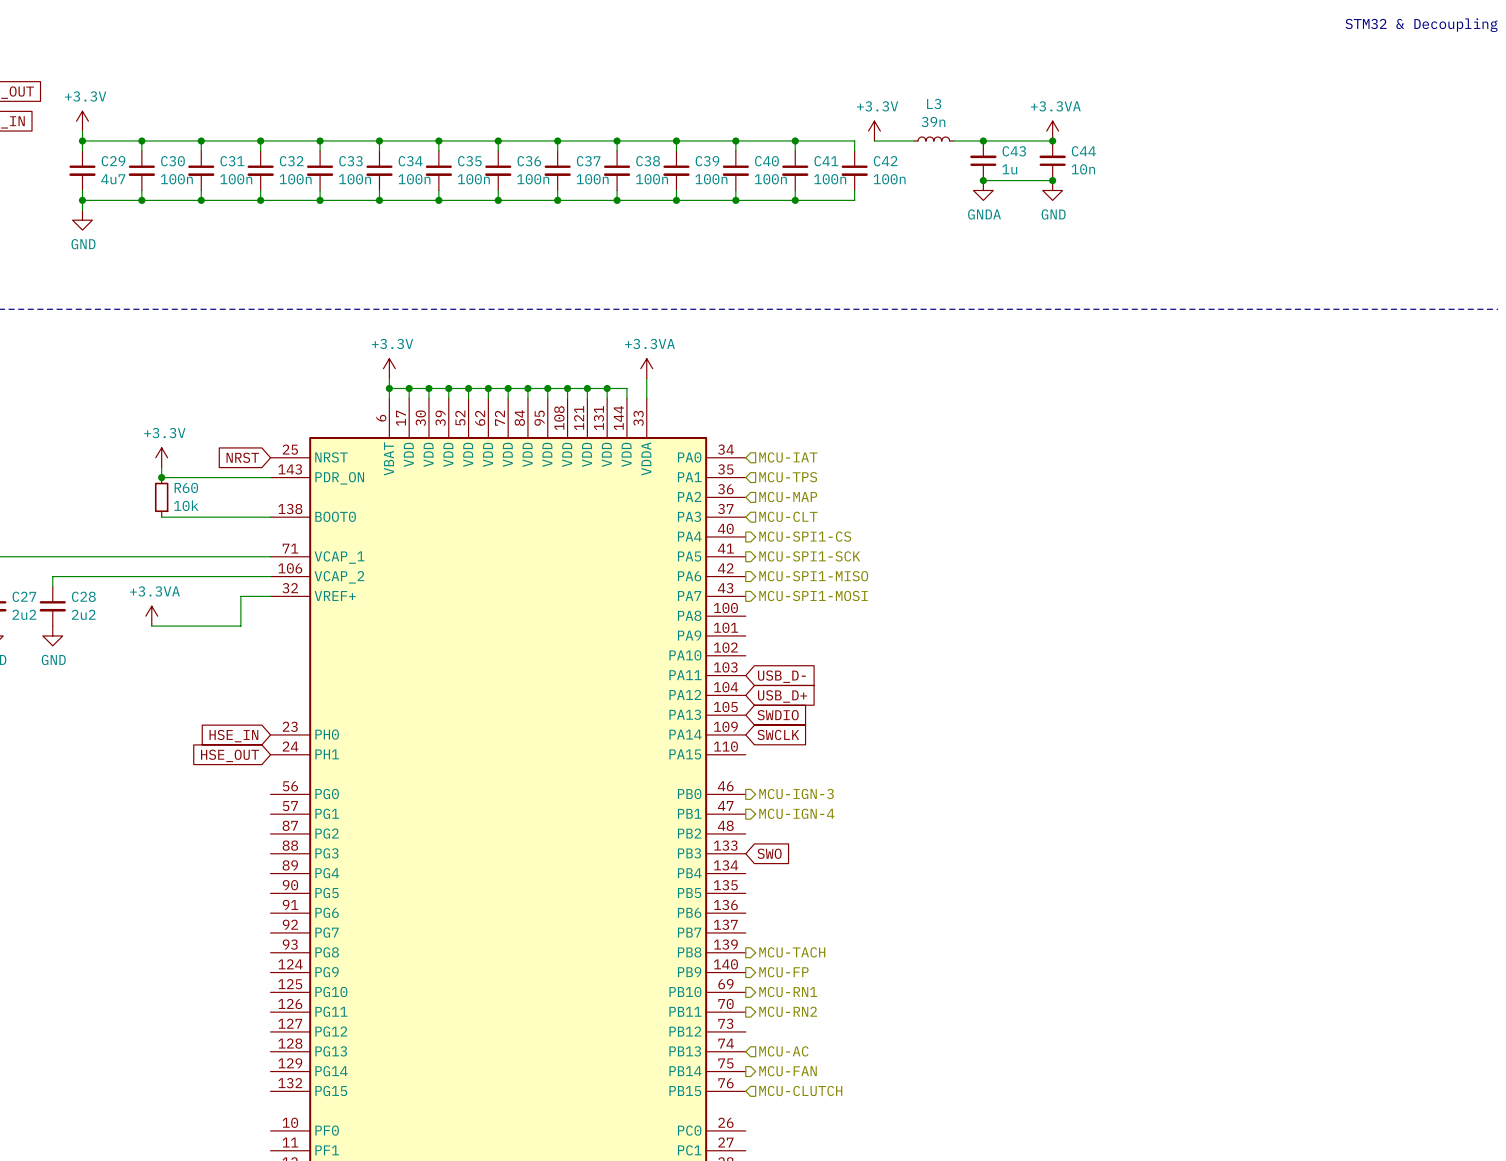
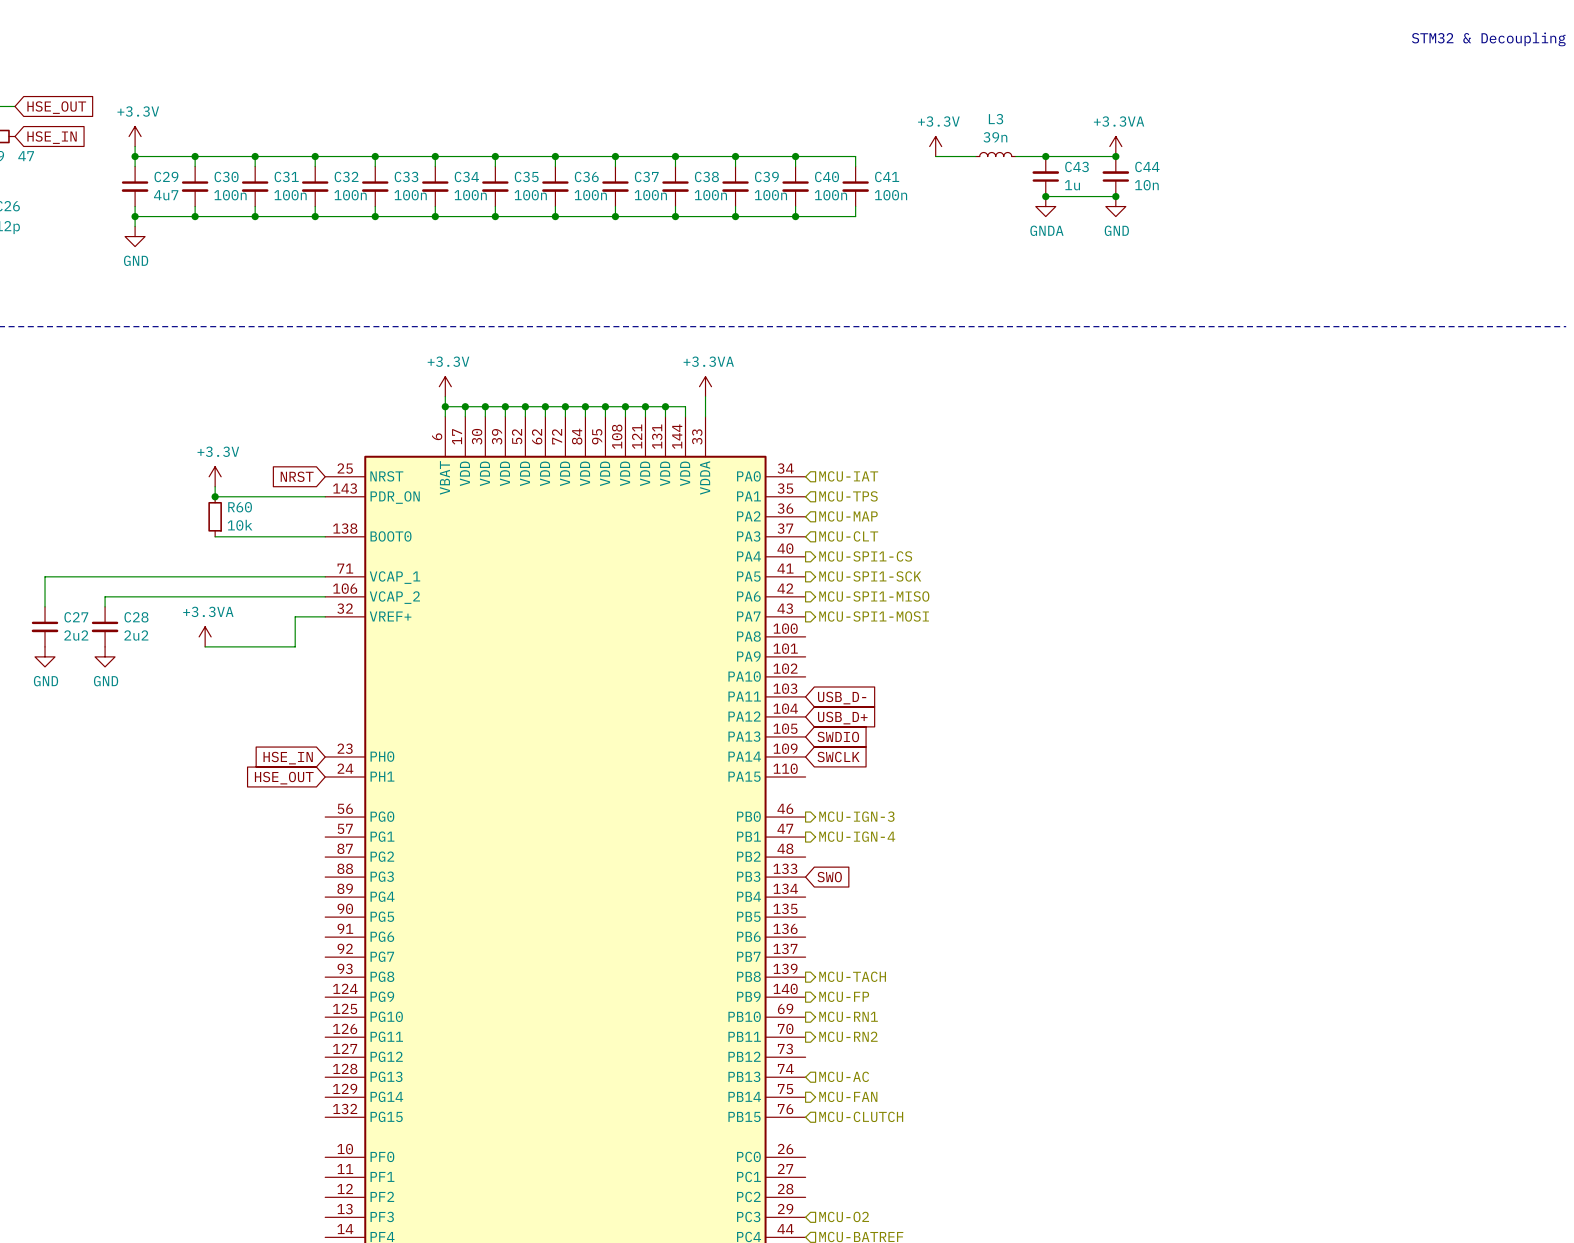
wire: (795, 140) (854, 140) (854, 150) -> none
junction: (795, 140) -> none
C42: 100n (854, 170) -> none
wire: (854, 190) (854, 200) (795, 200) -> none
junction: (795, 200) -> none

